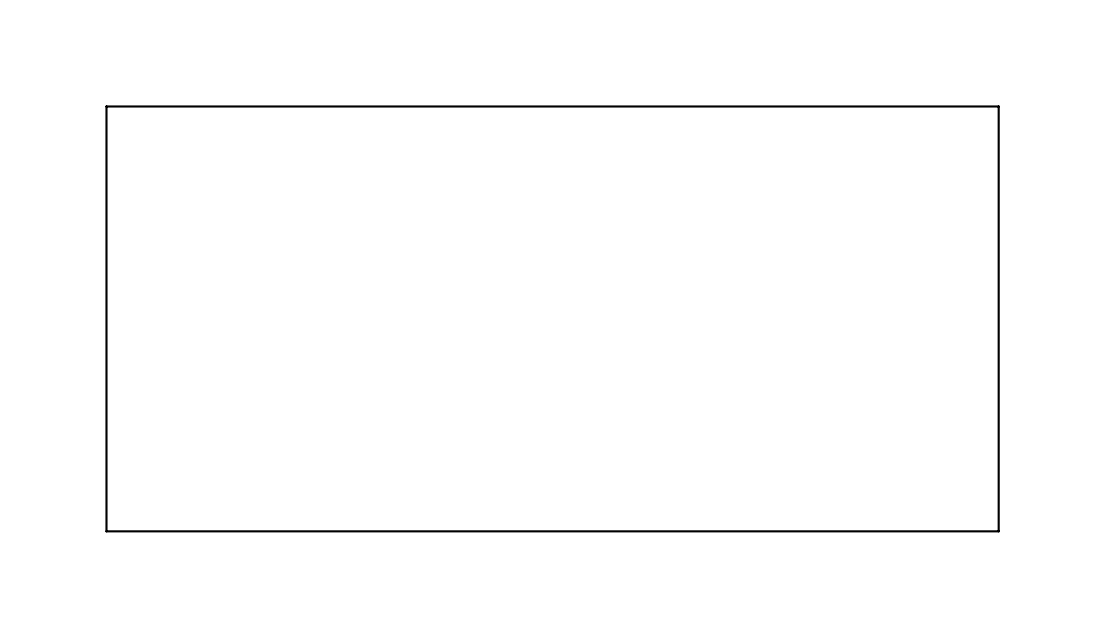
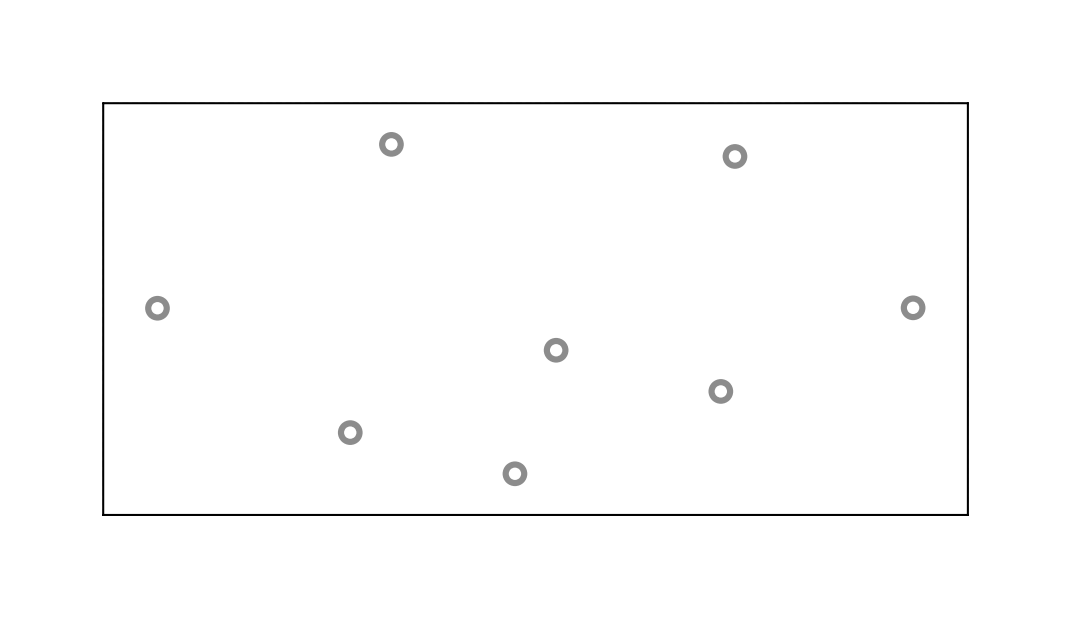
via: none -> (391, 144)
via: none -> (734, 156)
via: none -> (913, 307)
via: none -> (157, 308)
via: none -> (556, 350)
via: none -> (720, 391)
via: none -> (350, 432)
via: none -> (514, 473)

